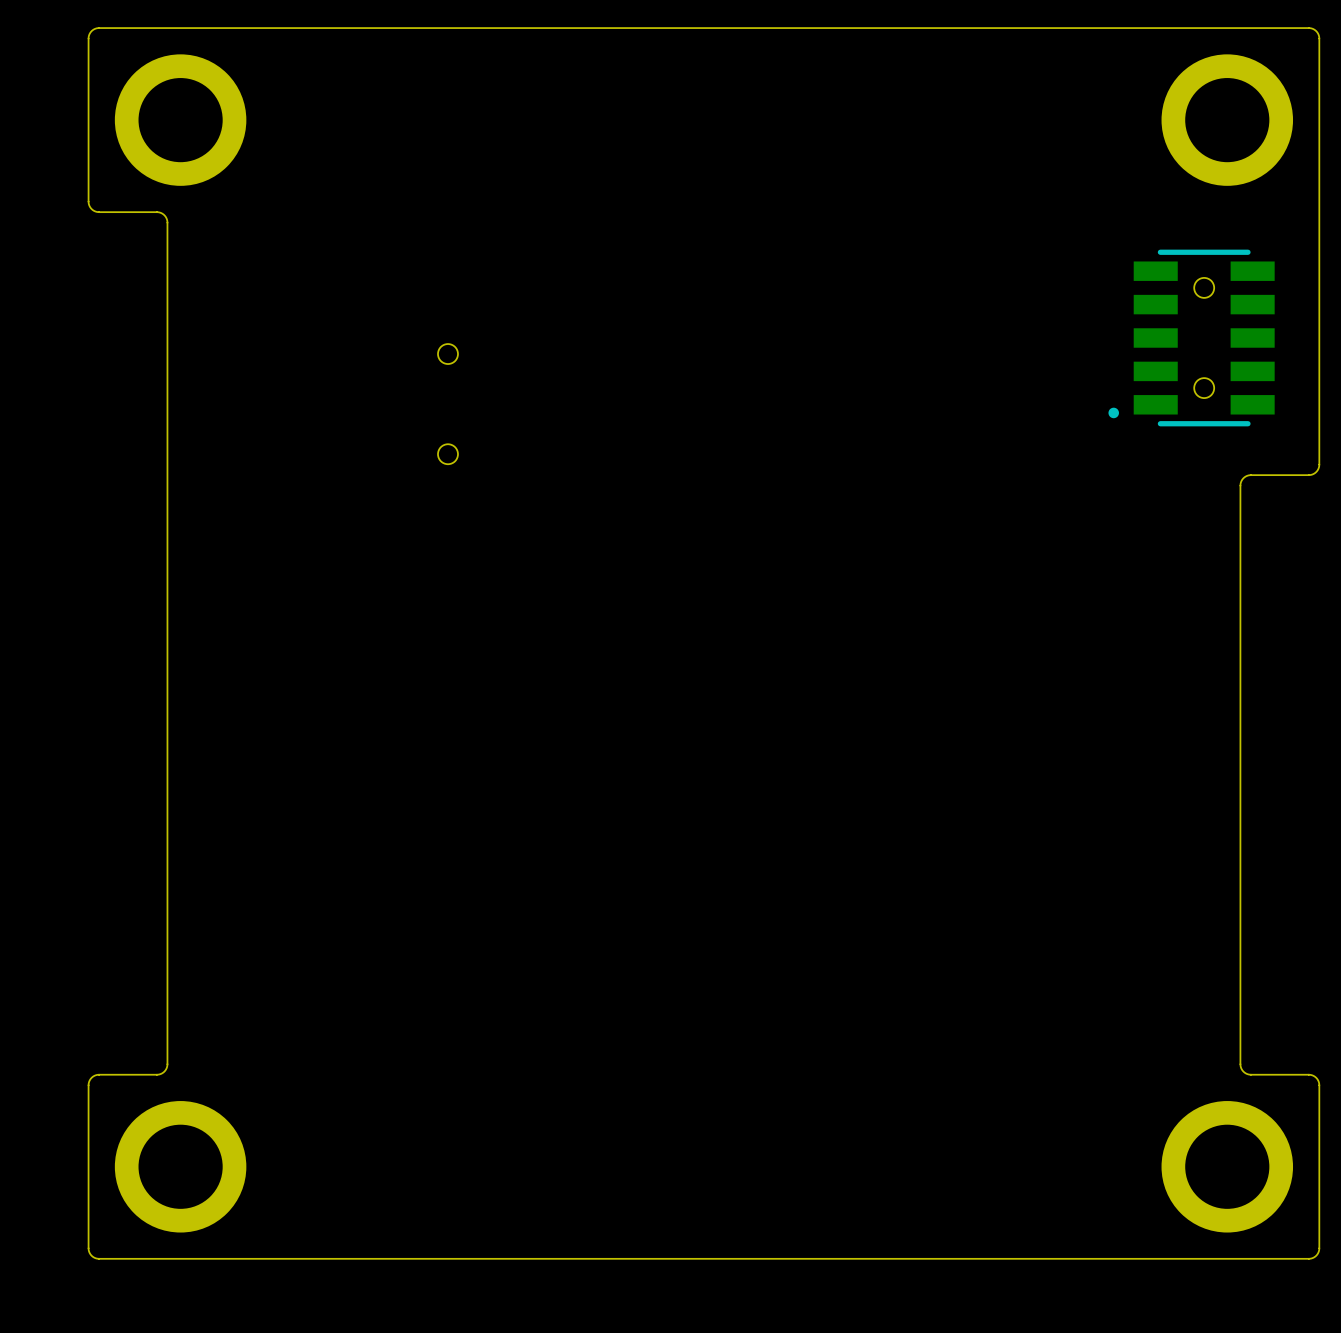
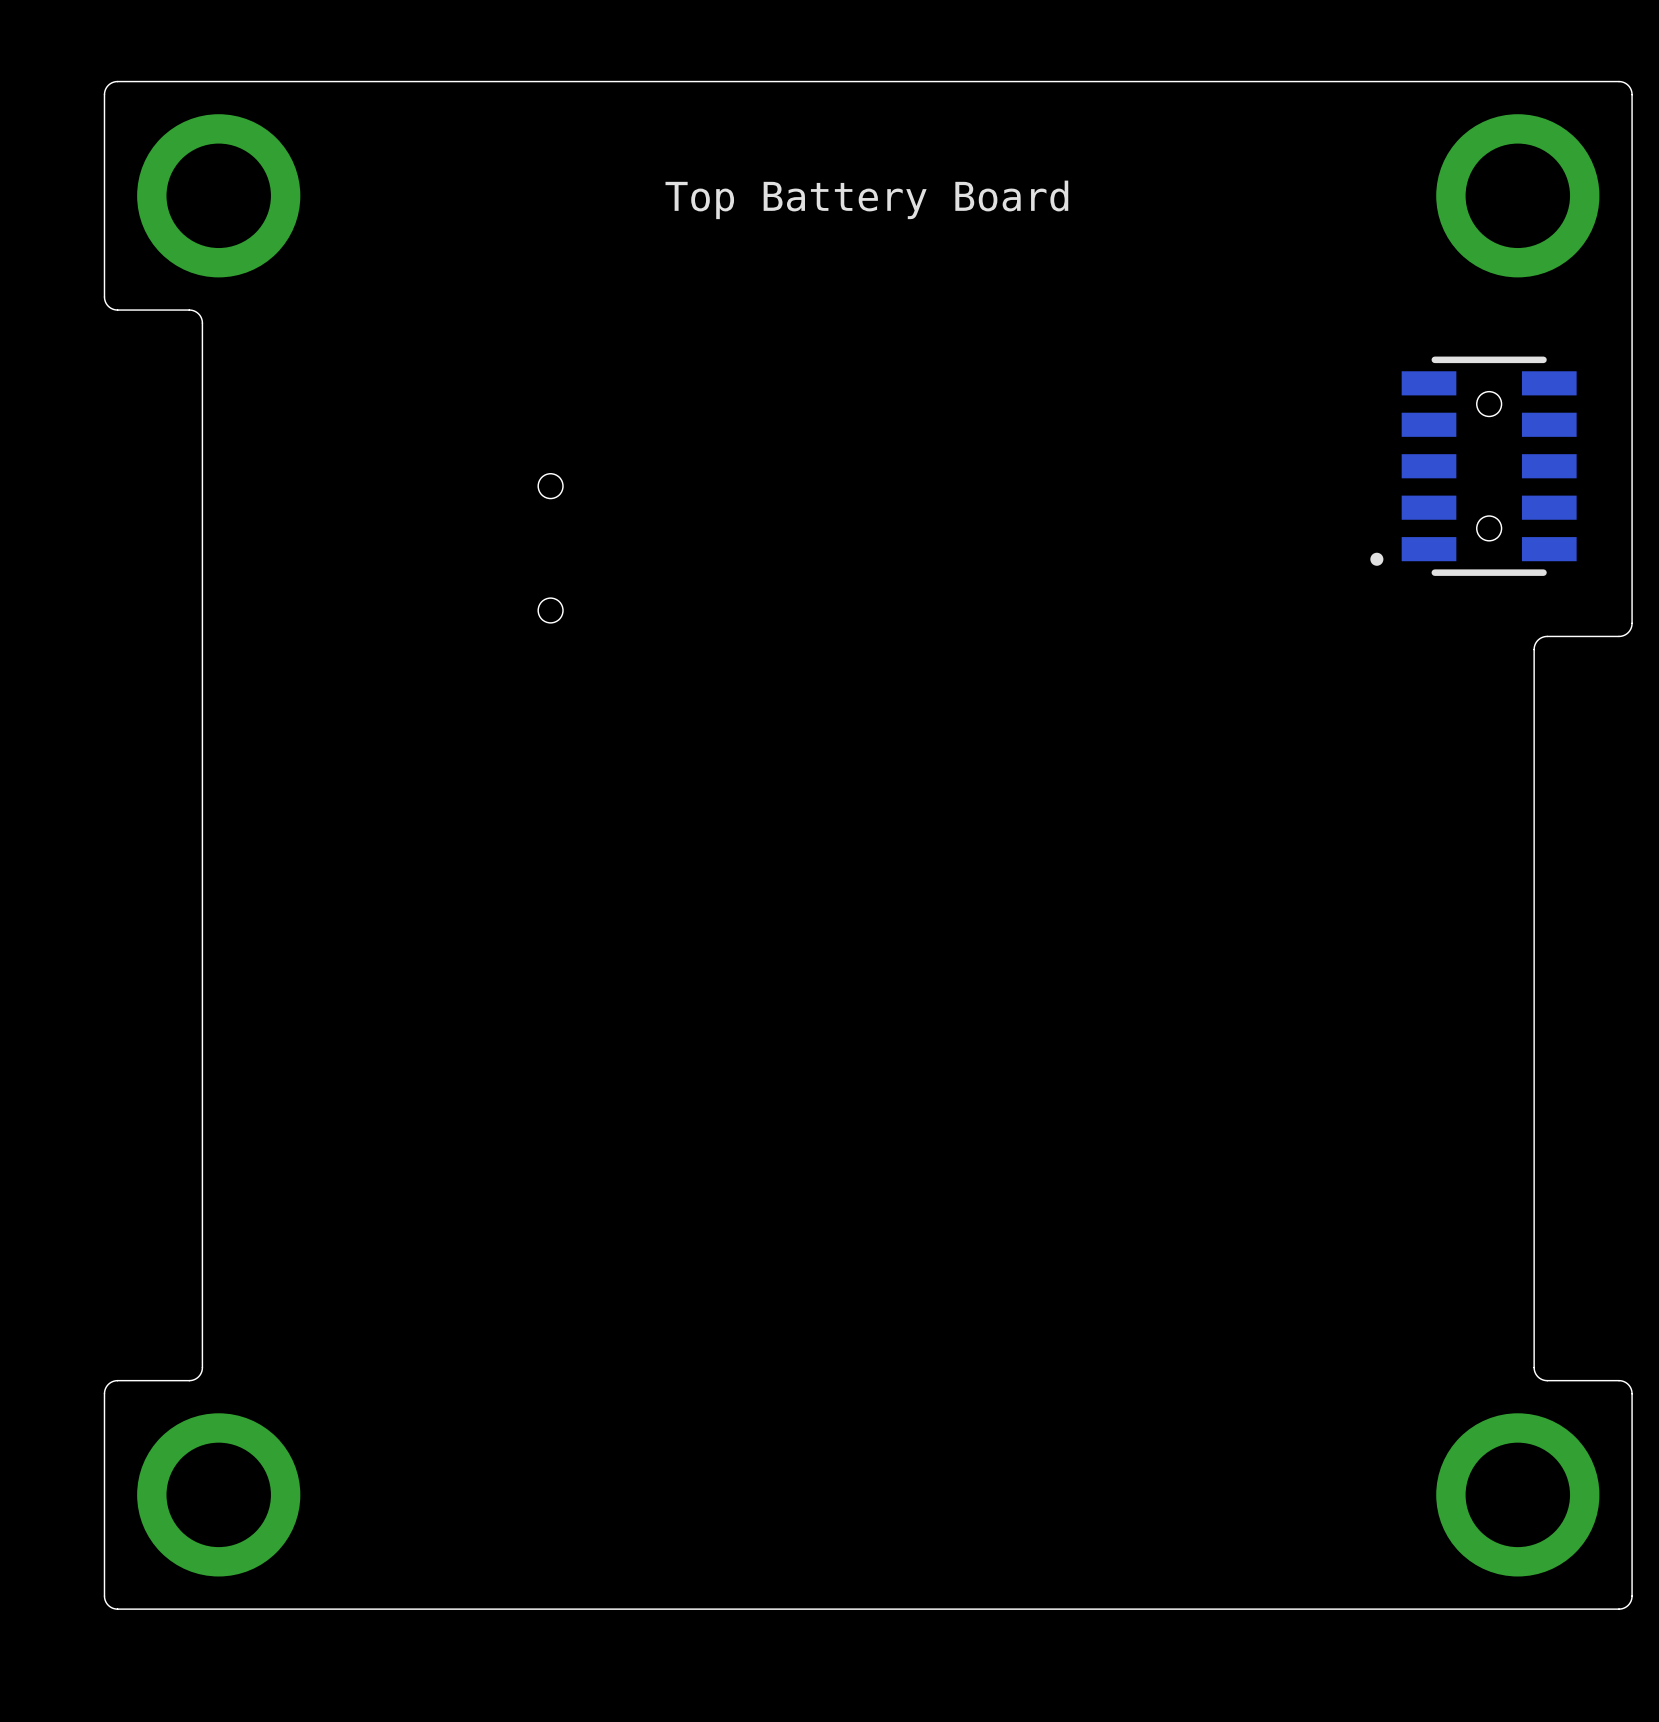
text: none -> Top Battery Board (866, 199)

